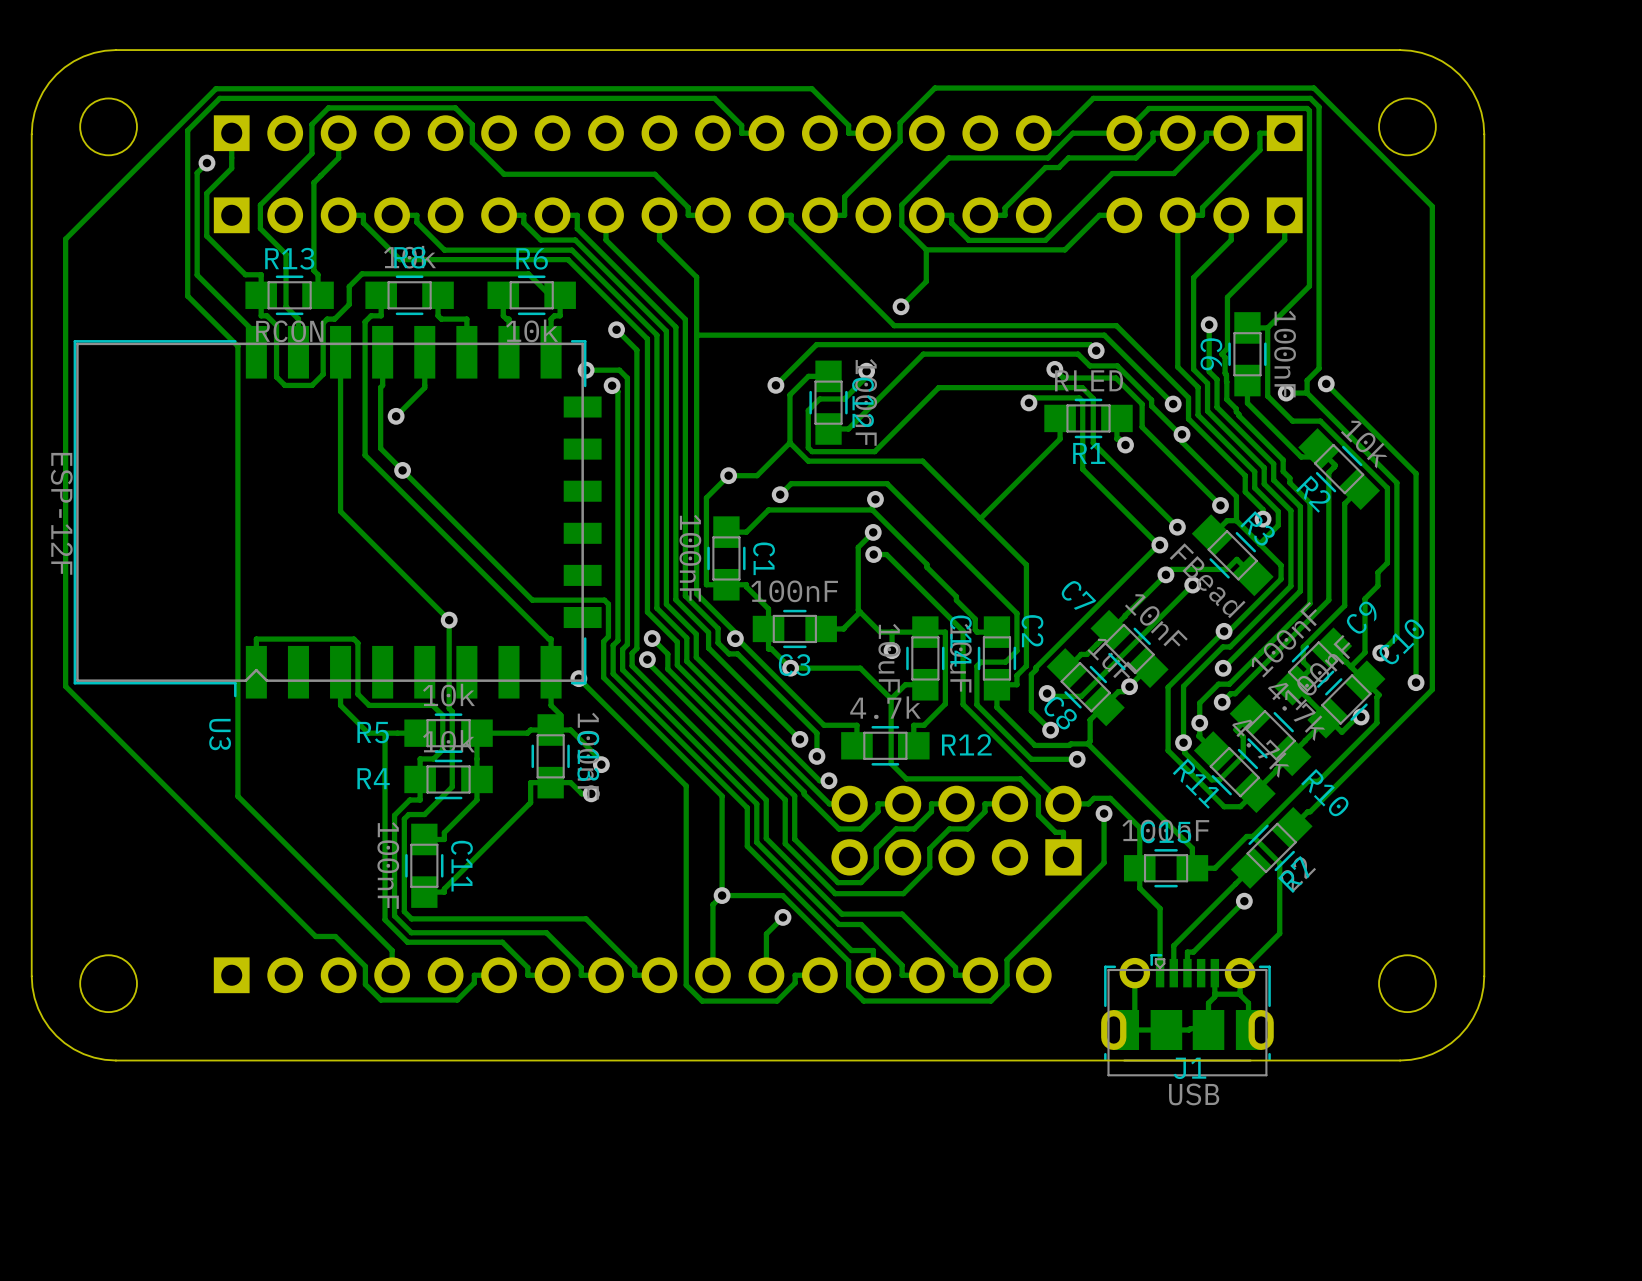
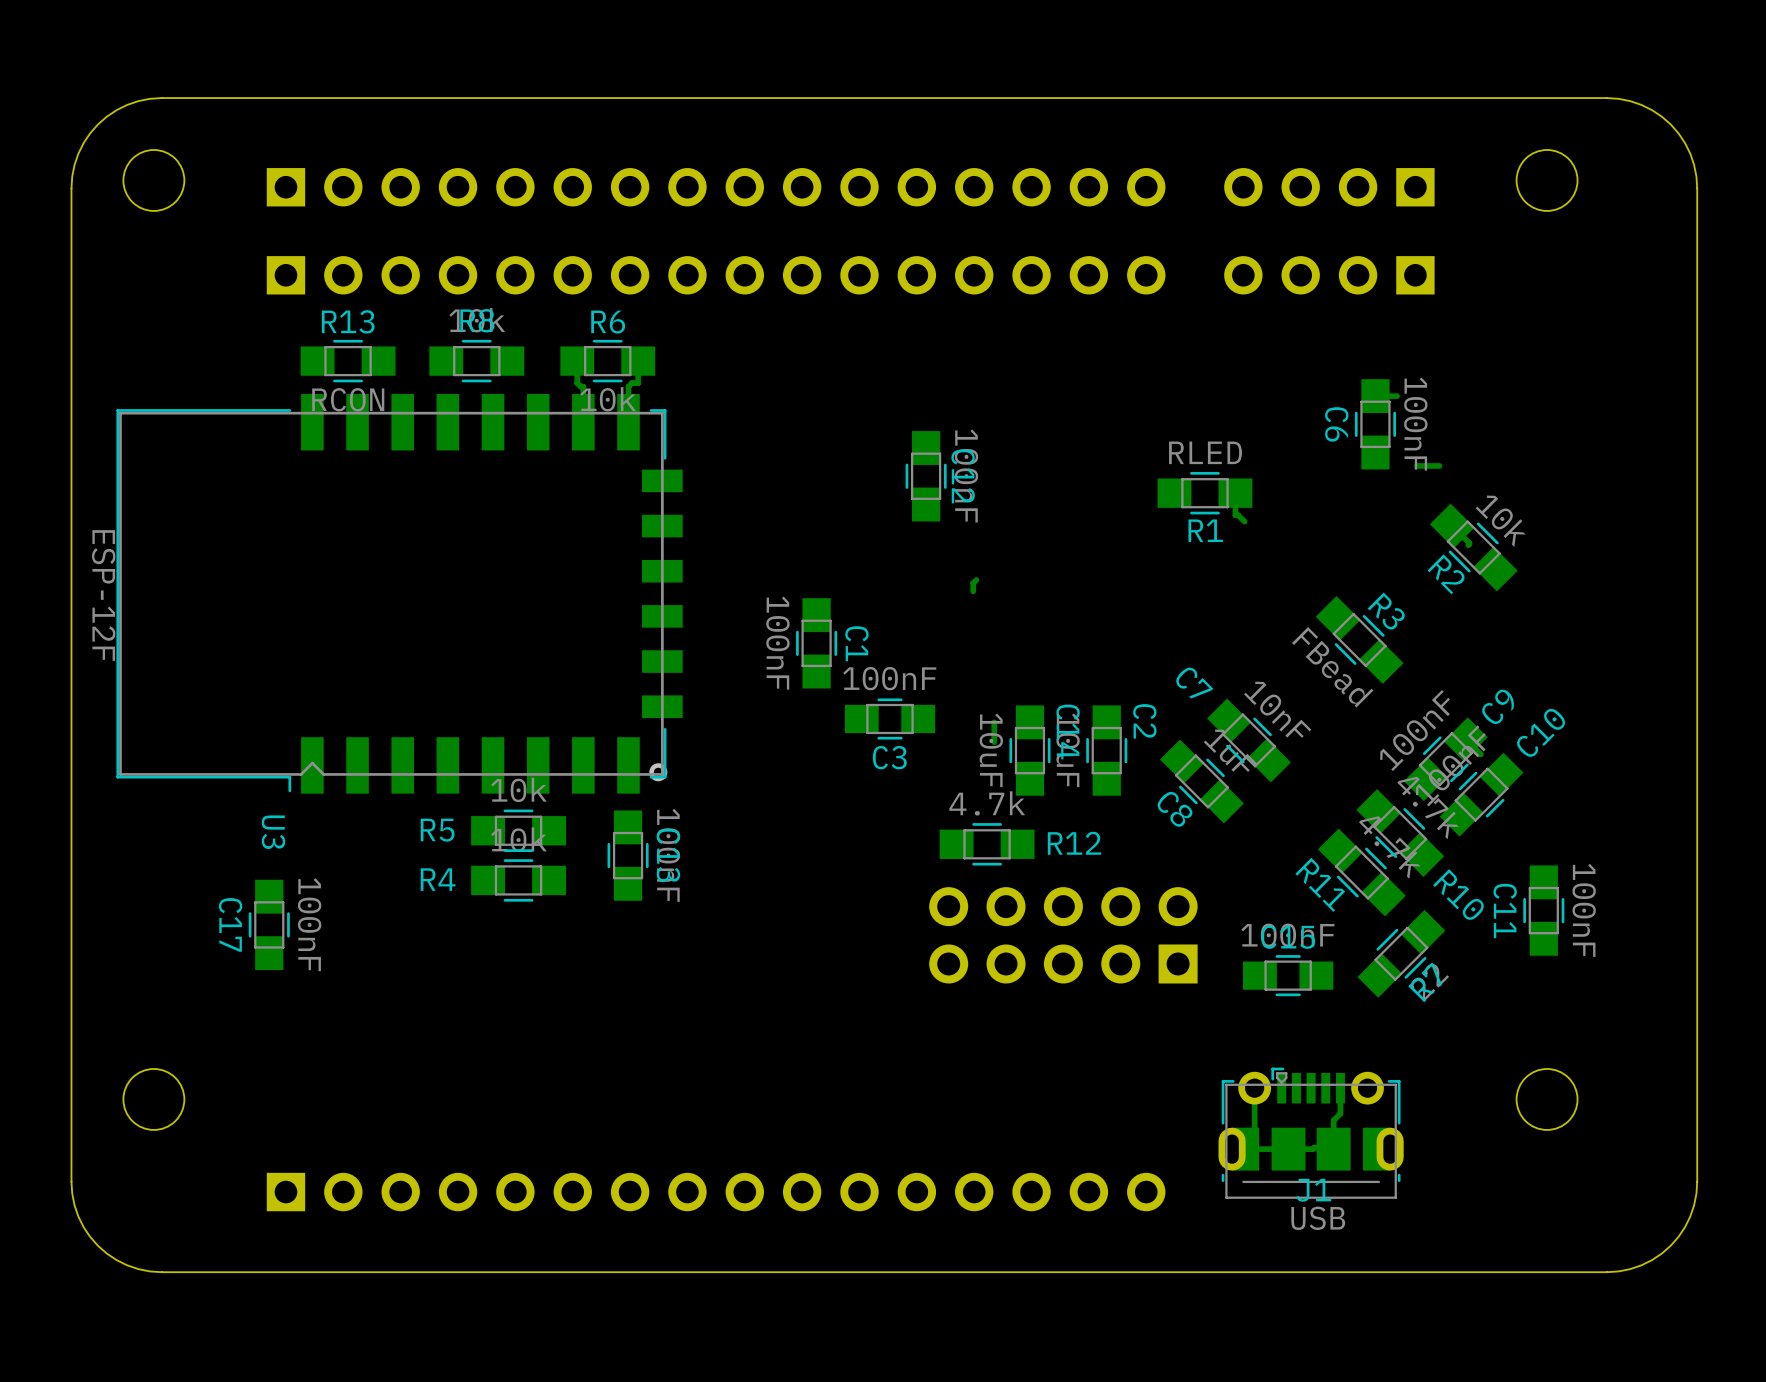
board edge: (1400, 50) (1432, 56) (1459, 74) (1477, 102) (1484, 134) (1484, 976) (1477, 1008) (1466, 1027) (1451, 1043) (1432, 1054) (1400, 1060) (115, 1060) (83, 1054) (56, 1035) (38, 1008) (31, 976) -> (1539, 98) (1618, 98) (1630, 101) (1652, 110) (1661, 116) (1678, 133) (1690, 153) (1696, 176) (1697, 1181) (1694, 1205) (1690, 1216) (1678, 1236) (1661, 1253) (1641, 1265) (1630, 1269) (1606, 1272) (150, 1271) (127, 1265) (106, 1253) (90, 1236) (78, 1216) (74, 1205) (71, 1181) (71, 1091)
track: (231, 133) (231, 168) (206, 193) (206, 236) (245, 274) (261, 274) (261, 315) (266, 315) (276, 325) (276, 377) (284, 385) (312, 385) (323, 374) (323, 323) (327, 319) (334, 319) (349, 304) (349, 286) (361, 273) (528, 273) (560, 305) -> none
track: (338, 133) (338, 157) (313, 182) (313, 270) (318, 274) (318, 295) -> none
track: (766, 133) (741, 133) (741, 125) (714, 98) (219, 98) (187, 130) (187, 296) (237, 346) (237, 796) (392, 950) (392, 975) -> none
track: (873, 133) (848, 133) (848, 125) (811, 88) (216, 88) (65, 239) (65, 686) (315, 936) (335, 936) (365, 966) (365, 984) (380, 1000) (457, 1000) (474, 982) (474, 975) (499, 975) -> none
track: (1033, 133) (1058, 133) (1093, 98) (1310, 98) (1319, 106) (1319, 368) (1307, 380) (1307, 393) (1396, 482) (1396, 636) (1380, 653) -> none
track: (1177, 133) (1153, 133) (1153, 140) (1136, 157) (1068, 157) (1058, 167) (1045, 167) (1005, 207) (1005, 215) (980, 215) -> none
track: (1231, 133) (1206, 133) (1206, 140) (1173, 173) (1112, 173) (1045, 240) (968, 240) (951, 223) (951, 215) (926, 215) -> none
track: (1284, 133) (1259, 133) (1259, 150) (1202, 207) (1202, 215) (1177, 215) (1177, 367) (1198, 387) (1198, 415) (1254, 471) (1254, 487) (1278, 511) (1278, 525) (1259, 543) -> none
track: (206, 163) (197, 172) (197, 275) (256, 334) (256, 352) -> none
via: (206, 163) -> none
track: (338, 215) (363, 215) (363, 223) (399, 259) (568, 259) (647, 339) (647, 612) (677, 642) (677, 665) (838, 828) (860, 828) (878, 811) (878, 803) (903, 803) -> none
track: (392, 215) (416, 215) (416, 222) (444, 250) (571, 250) (656, 335) (656, 608) (686, 638) (686, 661) (829, 803) (849, 803) -> none
track: (499, 215) (523, 215) (523, 223) (540, 240) (575, 240) (666, 331) (666, 604) (696, 634) (696, 657) (819, 780) (828, 780) -> none
track: (552, 215) (577, 215) (577, 228) (675, 327) (675, 599) (708, 632) (708, 648) (799, 739) -> none
track: (606, 215) (606, 240) (685, 319) (685, 595) (718, 628) (718, 642) (729, 653) (737, 653) (816, 733) (816, 756) -> none
track: (659, 215) (659, 240) (696, 277) (696, 593) (735, 632) (735, 638) (824, 725) (856, 725) (856, 745) -> none
track: (712, 215) (688, 215) (688, 207) (654, 174) (504, 174) (472, 142) (472, 124) (455, 107) (328, 107) (311, 124) (311, 153) (260, 205) (260, 228) (286, 254) (286, 306) (298, 319) (298, 352) -> none
track: (766, 215) (791, 215) (791, 222) (894, 325) (1116, 325) (1188, 397) (1188, 418) (1245, 475) (1245, 491) (1263, 509) (1263, 519) -> none
track: (819, 215) (844, 215) (844, 196) (900, 141) (900, 122) (934, 88) (1313, 88) (1432, 206) (1432, 689) (1310, 811) (1307, 811) (1291, 827) -> none
track: (1124, 215) (1099, 215) (1064, 249) (926, 249) -> none
track: (1231, 215) (1231, 240) (1193, 277) (1193, 369) (1207, 383) (1207, 411) (1264, 467) (1264, 484) (1290, 510) (1290, 586) (1230, 646) (1222, 646) (1183, 686) (1184, 752) (1211, 779) (1219, 779) (1243, 756) (1243, 736) (1236, 729) (1250, 715) -> none
track: (1284, 215) (1284, 240) (1227, 297) (1227, 348) (1221, 354) (1225, 357) (1226, 375) -> none
track: (926, 249) (901, 225) (901, 205) (948, 157) (1048, 157) (1072, 133) (1124, 133) (1149, 108) (1307, 108) (1309, 110) (1309, 286) (1267, 327) (1267, 396) (1292, 421) (1320, 421) (1387, 488) (1387, 563) (1377, 572) (1377, 585) (1365, 598) (1365, 652) (1350, 666) -> none
track: (926, 249) (926, 281) (901, 306) -> none
track: (381, 295) (381, 315) (371, 315) (365, 321) (365, 455) (548, 639) (551, 639) (551, 705) (560, 714) (560, 730) -> none
track: (438, 295) (438, 315) (441, 319) (466, 319) (466, 352) -> none
via: (901, 306) -> none
track: (1209, 324) (1209, 371) (1217, 379) (1217, 407) (1273, 463) (1273, 480) (1300, 506) (1300, 591) (1223, 668) -> none
via: (1209, 324) -> none
track: (616, 329) (636, 350) (636, 648) (632, 653) (632, 665) (766, 800) (766, 838) (841, 914) (902, 914) (955, 967) (955, 975) (980, 975) -> none
via: (616, 329) -> none
track: (696, 335) (1104, 335) (1173, 404) -> none
track: (1096, 350) (1090, 344) (816, 344) (775, 385) -> none
via: (1096, 350) -> none
track: (340, 352) (340, 511) (449, 620) (449, 708) (452, 711) (452, 786) (424, 814) (408, 814) (404, 818) (404, 911) (411, 918) (586, 918) (634, 967) (634, 975) (659, 975) -> none
track: (382, 352) (380, 448) (532, 600) (604, 600) (608, 604) (608, 636) (603, 641) (603, 677) (722, 796) (722, 895) -> none
track: (424, 352) (424, 387) (396, 416) -> none
track: (1054, 369) (1063, 378) (1115, 378) (1142, 404) (1142, 427) (1220, 505) -> none
via: (1054, 369) -> none
track: (586, 370) (619, 370) (627, 378) (627, 644) (622, 649) (622, 669) (756, 804) (756, 842) (838, 924) (861, 924) (902, 965) (902, 975) (926, 975) -> none
via: (586, 370) -> none
track: (866, 371) (866, 376) (844, 398) (819, 398) (808, 410) (808, 447) (812, 451) (874, 451) (938, 387) (1082, 387) (1093, 398) (1093, 443) (1177, 527) -> none
via: (866, 371) -> none
track: (1226, 375) (1226, 399) (1236, 408) (1238, 415) (1283, 459) (1283, 471) (1289, 478) (1289, 482) (1309, 502) (1309, 603) (1229, 684) (1218, 684) (1199, 703) (1198, 736) (1214, 752) -> none
track: (828, 376) (808, 376) (789, 394) (789, 442) -> none
track: (1247, 380) (1247, 403) (1301, 456) (1327, 456) -> none
track: (1326, 383) (1416, 473) (1416, 682) -> none
via: (1326, 383) -> none
track: (612, 385) (617, 391) (617, 640) (613, 645) (613, 673) (747, 807) (747, 846) (851, 950) (873, 950) (873, 975) -> none
via: (612, 385) -> none
via: (775, 385) -> none
via: (1286, 393) -> none
track: (1028, 402) (1033, 397) (1079, 397) (1082, 401) (1082, 469) (1158, 545) -> none
via: (1028, 402) -> none
via: (1173, 404) -> none
via: (396, 416) -> none
track: (1060, 418) (1060, 438) (980, 518) -> none
track: (828, 428) (848, 428) (923, 354) (1078, 354) (1089, 365) (1117, 365) (1151, 400) (1151, 405) (1182, 434) (1182, 442) (1236, 496) (1236, 520) -> none
via: (1182, 434) -> none
track: (789, 442) (808, 461) (922, 461) (1026, 564) (1026, 666) (1016, 675) (1016, 684) (996, 684) (996, 707) (1034, 745) (1088, 743) -> none
track: (789, 442) (757, 475) (728, 475) (706, 497) (706, 584) (746, 584) (768, 608) (768, 648) (771, 648) (790, 668) (860, 668) (891, 698) -> none
via: (1125, 445) -> none
track: (1334, 467) (1328, 472) (1328, 600) (1235, 693) (1230, 693) (1222, 702) -> none
via: (402, 470) -> none
via: (728, 475) -> none
track: (1359, 489) (1344, 503) (1344, 605) (1303, 647) (1303, 661) (1310, 669) (1294, 685) (1327, 718) (1240, 806) (1224, 806) (1168, 750) (1168, 687) (1224, 631) (1228, 631) (1281, 579) (1281, 565) (1236, 520) -> none
track: (780, 494) (791, 483) (887, 483) (1016, 613) (1016, 650) (1005, 662) (980, 662) (976, 666) (976, 704) (1031, 759) (1077, 759) -> none
via: (780, 494) -> none
via: (875, 499) -> none
via: (1220, 505) -> none
via: (1263, 519) -> none
track: (1236, 520) (1227, 520) (1212, 535) -> none
via: (1177, 527) -> none
track: (726, 532) (746, 532) (768, 509) (872, 509) (956, 596) (956, 600) (975, 619) (976, 632) (996, 632) -> none
track: (873, 532) (858, 547) (858, 610) (880, 632) (945, 632) (945, 703) (924, 725) (913, 725) (913, 745) -> none
via: (873, 532) -> none
track: (1158, 545) (1035, 667) (1031, 674) (1031, 710) (1050, 730) -> none
via: (1159, 545) -> none
track: (873, 554) (886, 554) (963, 631) (963, 704) (1062, 803) (1088, 803) (1094, 798) (1110, 798) (1139, 827) (1139, 888) (1160, 908) (1160, 973) -> none
via: (873, 554) -> none
via: (1165, 574) -> none
track: (1252, 575) (1236, 559) (1226, 569) (1171, 569) (1086, 654) (1081, 654) (1067, 668) -> none
track: (1192, 585) (1081, 696) (1050, 696) (1047, 693) -> none
via: (1192, 585) -> none
track: (860, 612) (843, 628) (821, 628) -> none
via: (449, 620) -> none
via: (1224, 631) -> none
track: (652, 638) (667, 654) (667, 669) (794, 795) (794, 839) (838, 882) (861, 882) (876, 867) (876, 848) (896, 828) (914, 828) (931, 811) (931, 803) (956, 803) -> none
via: (652, 638) -> none
via: (735, 638) -> none
via: (892, 650) -> none
via: (1380, 653) -> none
track: (647, 659) (647, 662) (785, 799) (785, 843) (835, 893) (903, 893) (929, 867) (929, 848) (949, 828) (967, 828) (984, 811) (984, 803) (1009, 803) -> none
via: (647, 659) -> none
track: (1346, 662) (1379, 695) (1376, 697) (1376, 722) (1318, 781) (1308, 781) (1253, 836) -> none
track: (1148, 667) (1124, 691) (1118, 691) (1090, 719) (1090, 741) (1088, 743) -> none
via: (790, 668) -> none
via: (1223, 668) -> none
track: (256, 672) (256, 639) (353, 639) (357, 643) (357, 694) (369, 705) (432, 705) (442, 715) (442, 749) (433, 758) (420, 758) (420, 800) (409, 800) (394, 815) (394, 915) (411, 932) (546, 932) (581, 967) (581, 975) (606, 975) -> none
track: (340, 672) (340, 705) (368, 733) (420, 733) -> none
track: (578, 678) (686, 786) (686, 985) (702, 1001) (777, 1001) (795, 982) (795, 975) (819, 975) -> none
via: (1416, 682) -> none
track: (925, 684) (905, 684) (891, 698) -> none
via: (1129, 686) -> none
via: (1047, 693) -> none
track: (891, 698) (891, 763) (906, 778) (1020, 778) (1038, 796) (1038, 815) (1055, 832) (1063, 832) (1063, 857) -> none
via: (1222, 702) -> none
track: (1361, 716) (1356, 718) (1341, 732) (1327, 718) -> none
via: (1361, 716) -> none
via: (1199, 723) -> none
via: (1050, 730) -> none
track: (385, 733) (385, 919) (407, 942) (502, 942) (527, 967) (527, 975) (552, 975) -> none
via: (799, 739) -> none
via: (1183, 742) -> none
track: (1088, 743) (1192, 848) (1192, 868) (1215, 868) (1246, 836) (1253, 836) -> none
via: (816, 756) -> none
via: (1077, 759) -> none
track: (601, 764) (601, 760) (570, 730) (530, 730) (527, 733) (476, 733) (476, 800) (444, 832) (444, 839) (424, 839) -> none
via: (601, 764) -> none
via: (828, 780) -> none
track: (591, 793) (581, 793) (570, 782) (530, 782) (530, 802) (444, 888) (444, 892) (424, 892) -> none
via: (591, 793) -> none
track: (1104, 813) (1104, 862) (1007, 959) (1007, 984) (991, 1001) (863, 1001) (848, 985) (848, 961) (782, 895) (722, 895) -> none
via: (1104, 813) -> none
C17: none -> 100nF (269, 924)
track: (1253, 836) (1279, 863) (1279, 933) (1240, 973) (1240, 994) (1248, 1003) (1248, 1029) (1261, 1029) -> none
C11 value position: 100nF (388, 865) -> 100nF (1584, 910)
C11 position: (424, 865) -> (1543, 910)
C11 name position: C11 (461, 866) -> C11 (1505, 910)
track: (1251, 867) (1173, 945) (1173, 973) -> none
track: (722, 895) (712, 904) (712, 975) -> none
via: (722, 895) -> none
track: (1244, 901) (1193, 952) (1187, 952) (1187, 973) -> none
via: (1244, 901) -> none
track: (782, 917) (766, 933) (766, 975) -> none
via: (782, 917) -> none
part position: (632, 975) -> (716, 1192)
track: (1240, 994) (1214, 994) -> none

